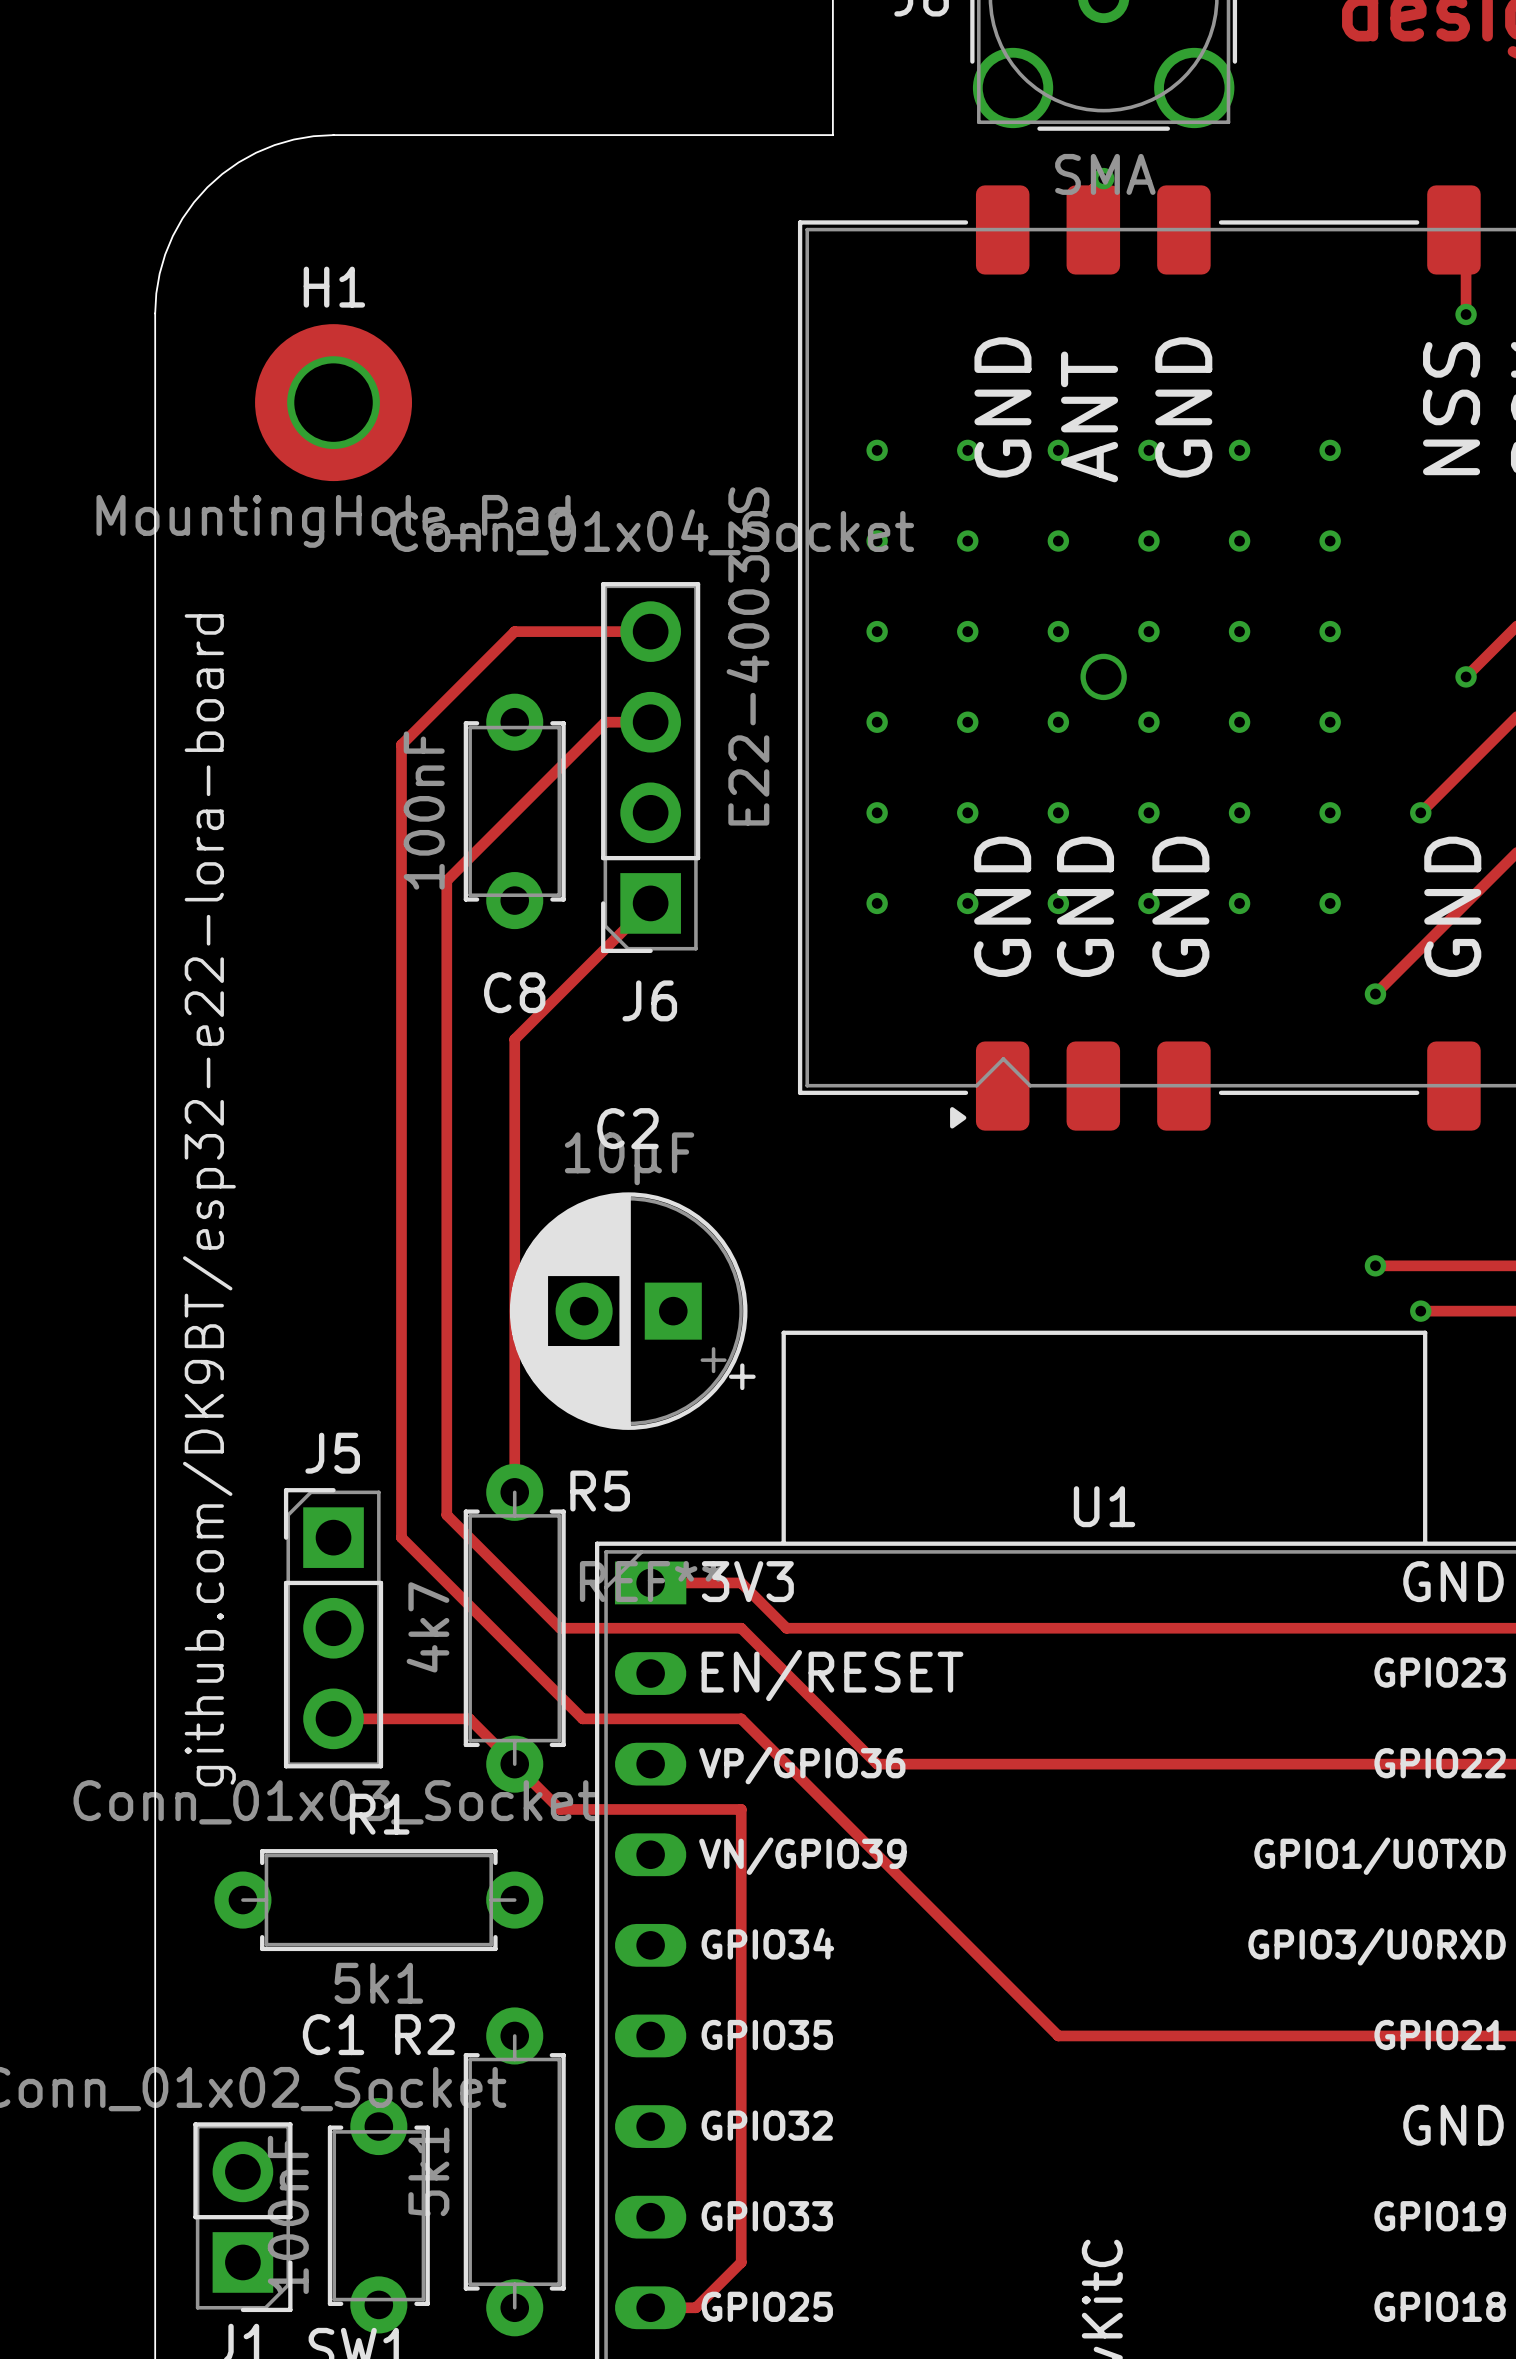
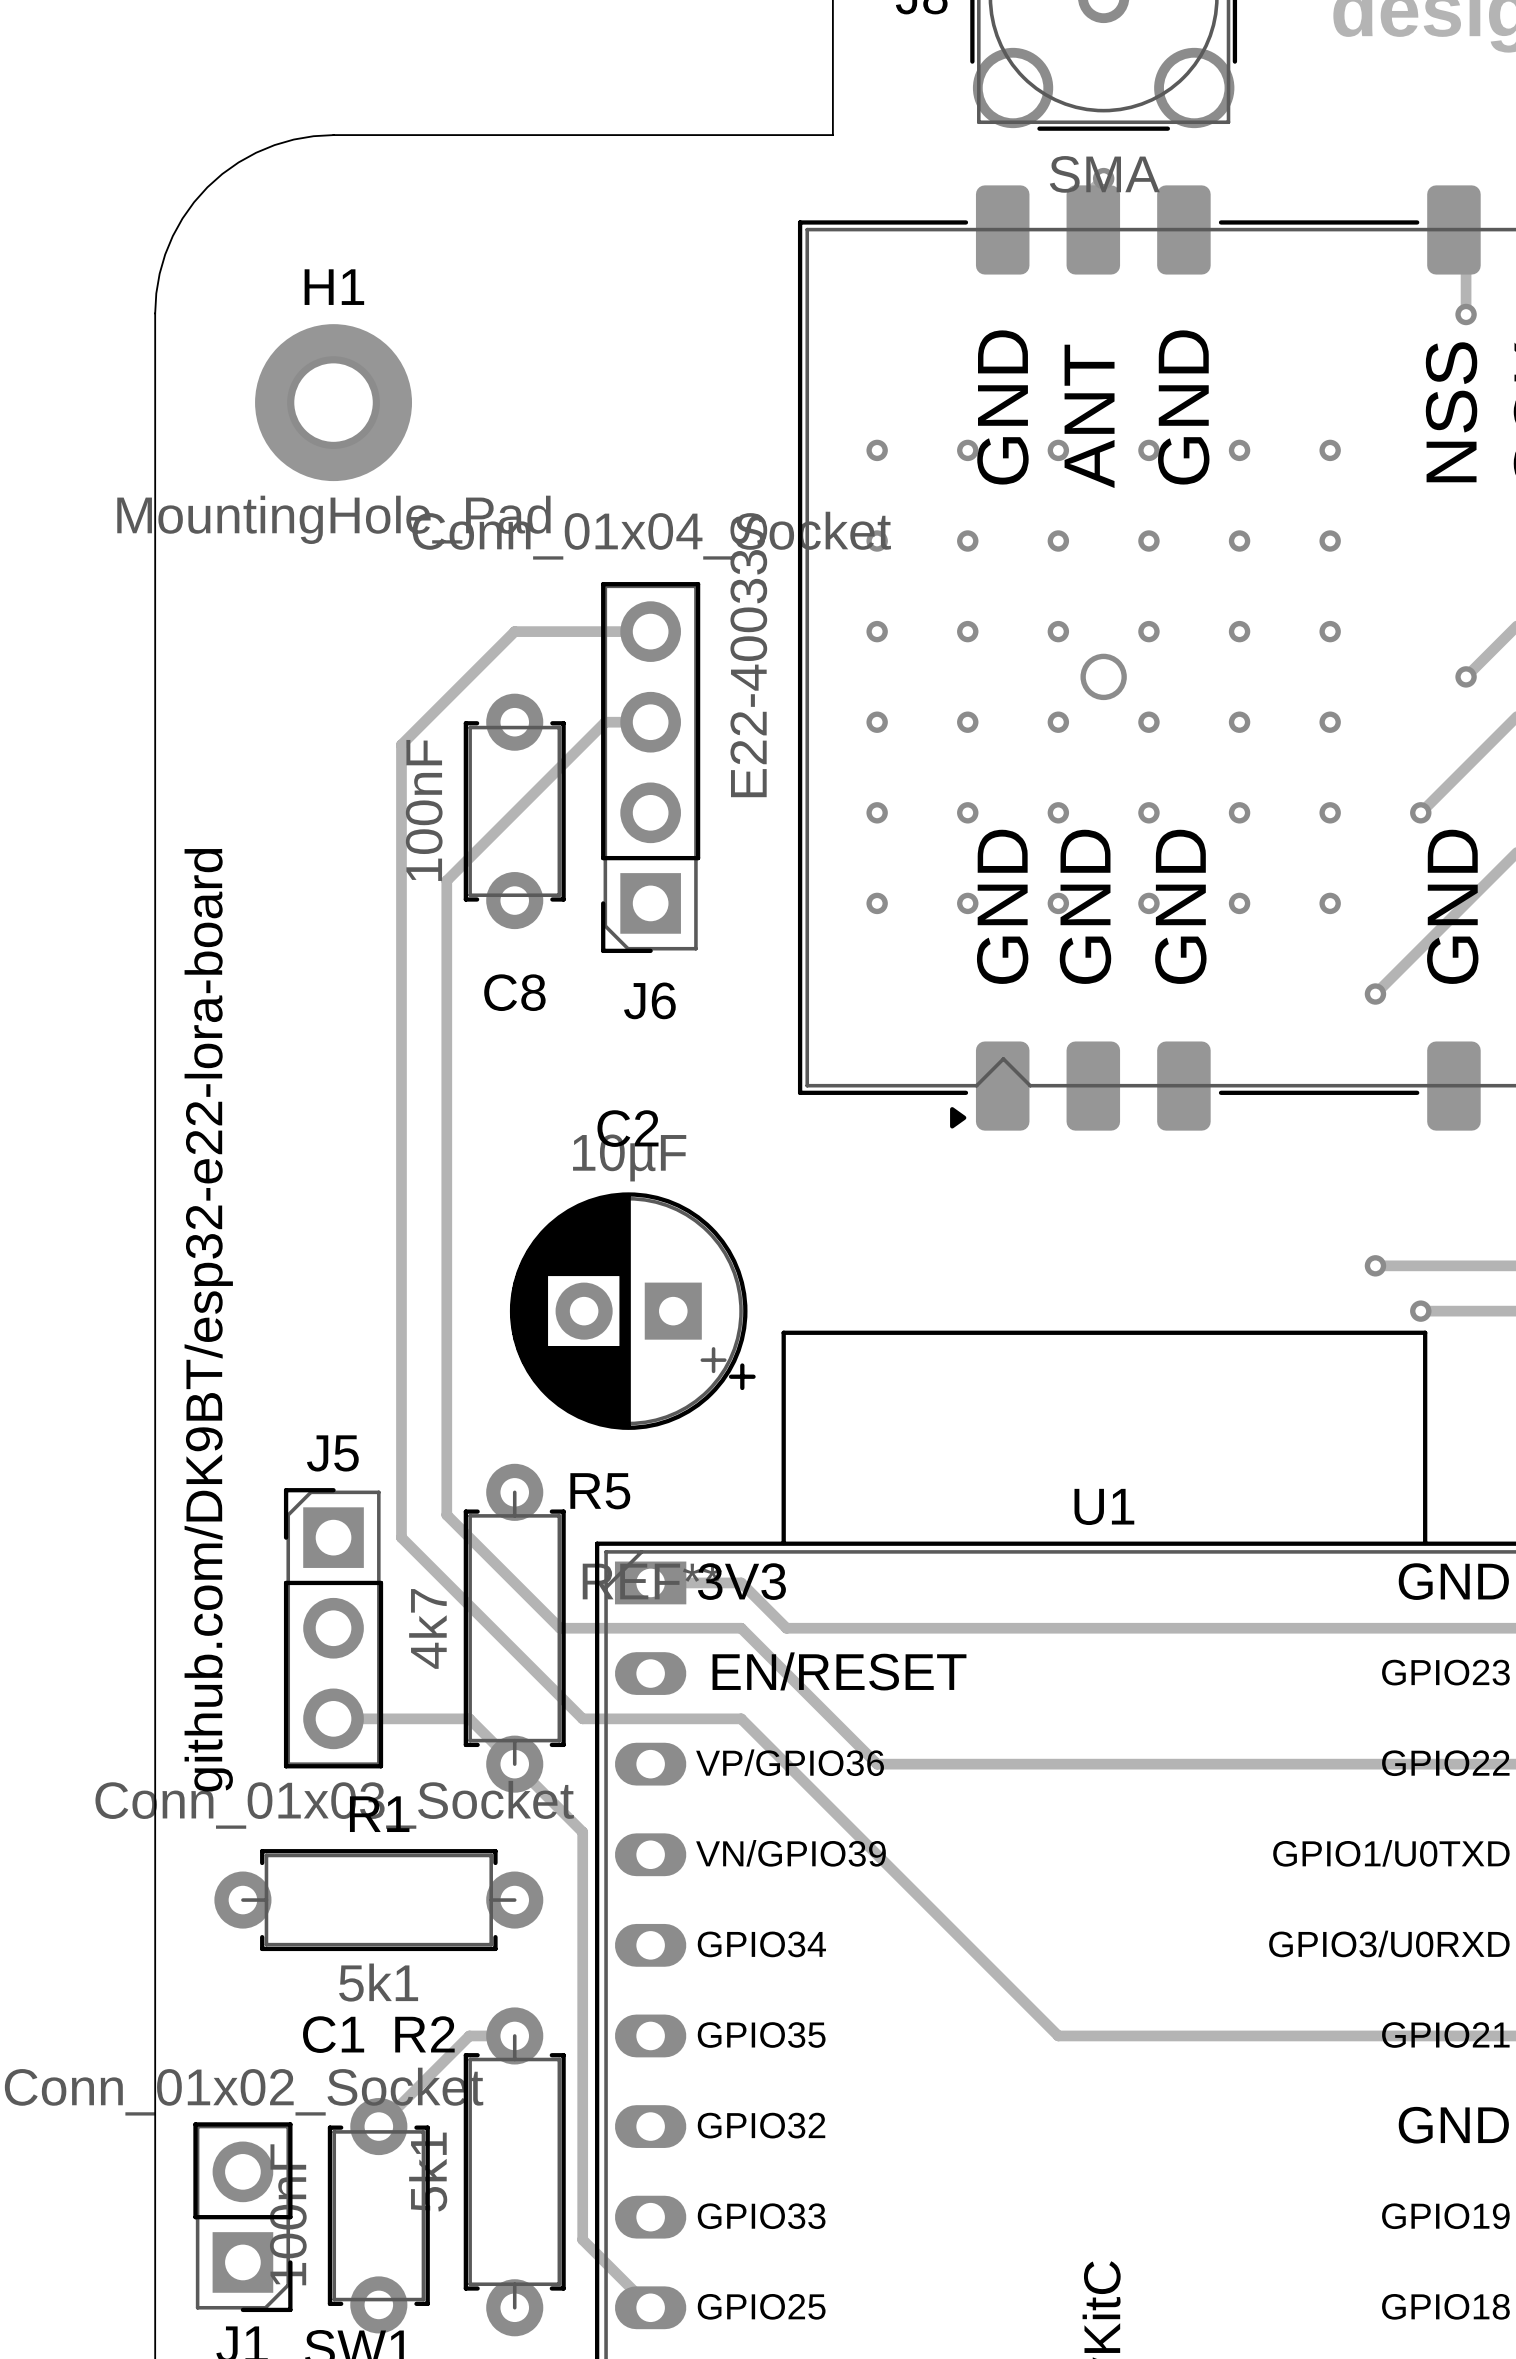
track: (650, 903) (514, 1039) (514, 1492) -> none
track: (560, 1809) (741, 1809) (741, 2262) (695, 2307) (650, 2307) -> (560, 1809) (582, 1832) (582, 2239) (650, 2307)
track: none -> (514, 2035) (469, 2035) (378, 2126)

